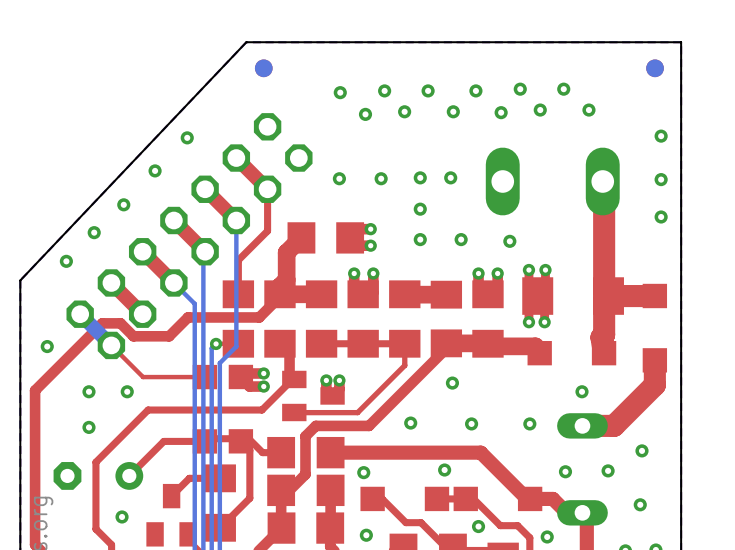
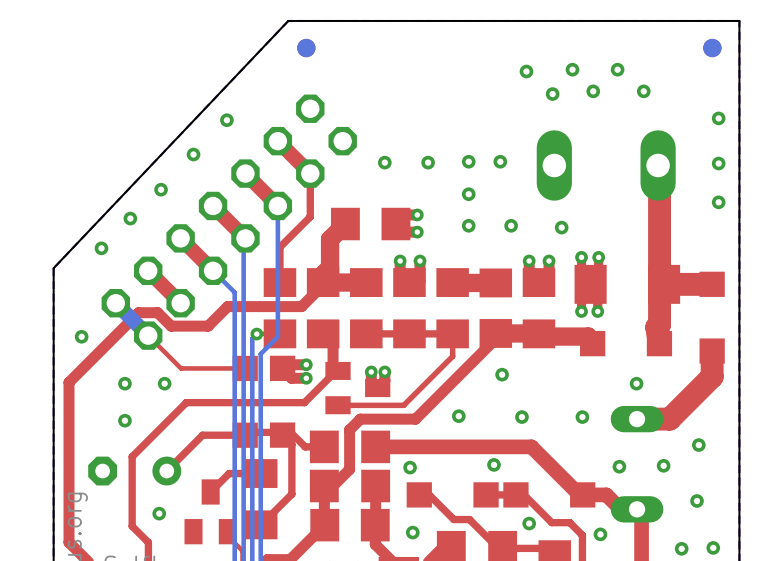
via: (384, 90) -> none
via: (428, 90) -> none
via: (340, 92) -> none
via: (404, 111) -> none
via: (453, 111) -> none
via: (365, 114) -> none

